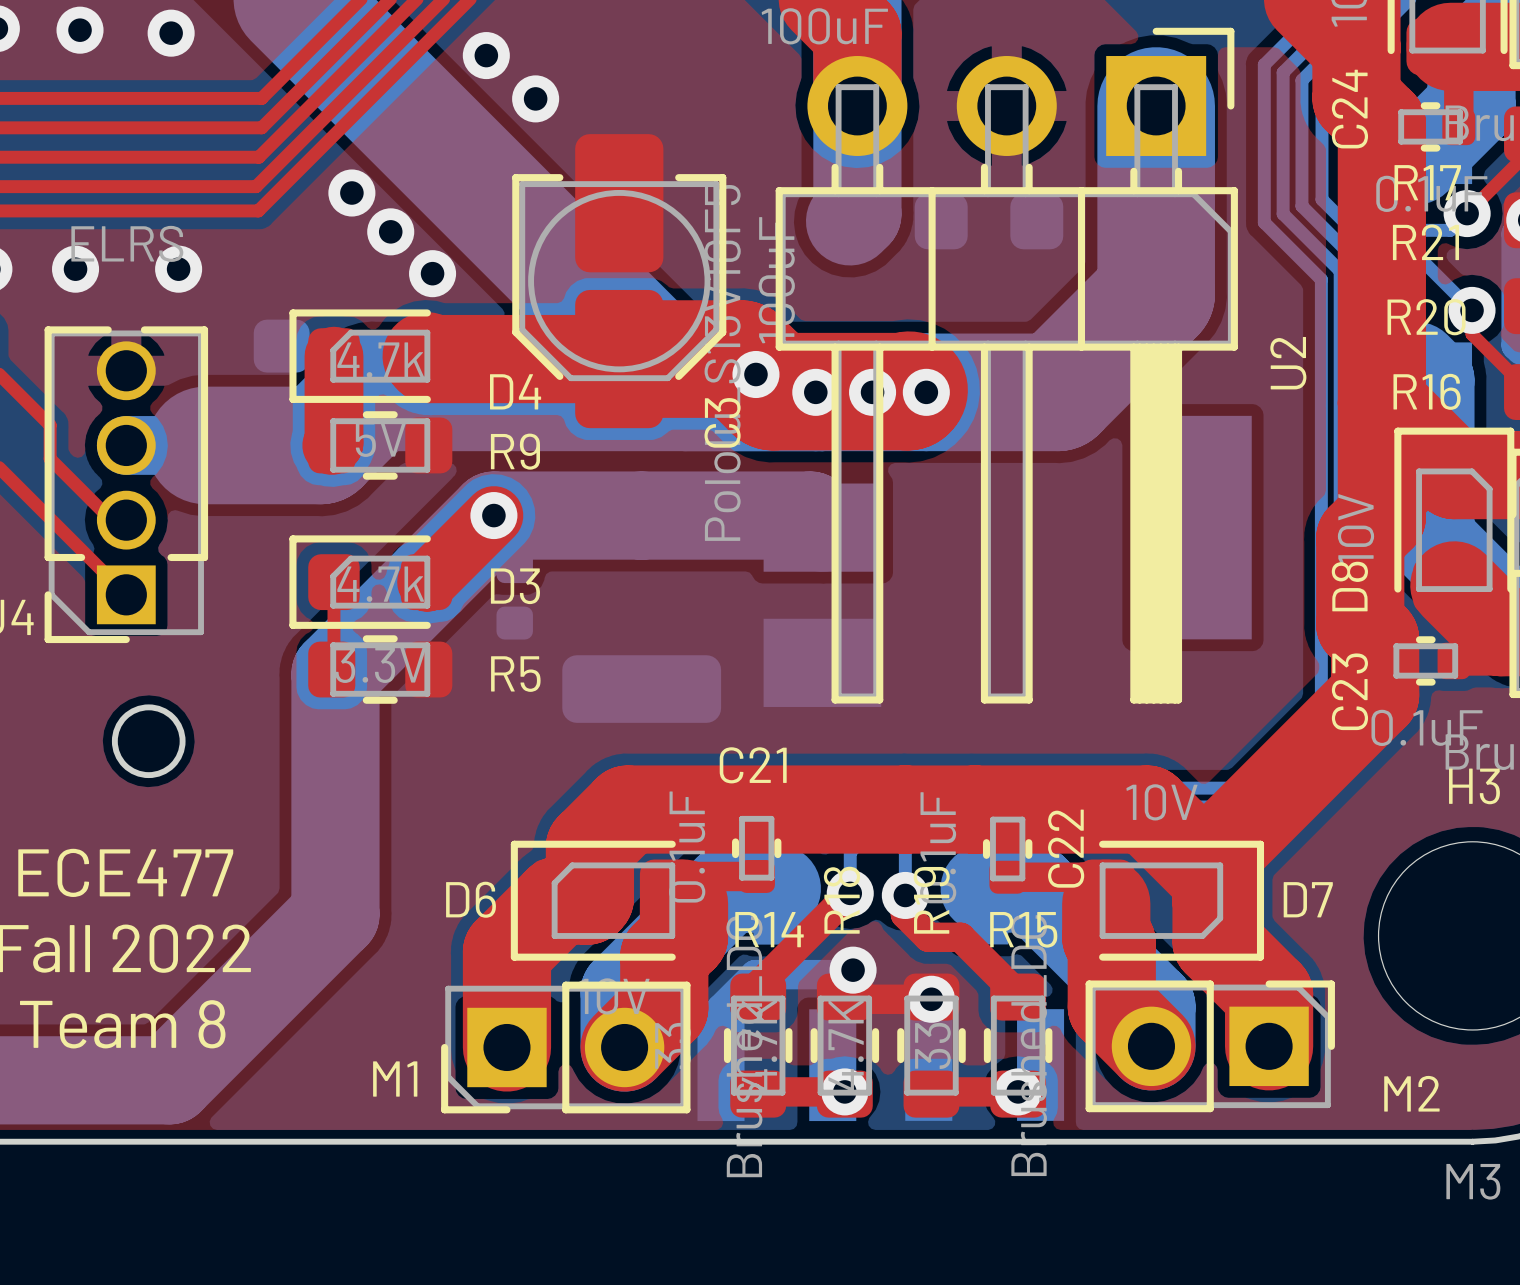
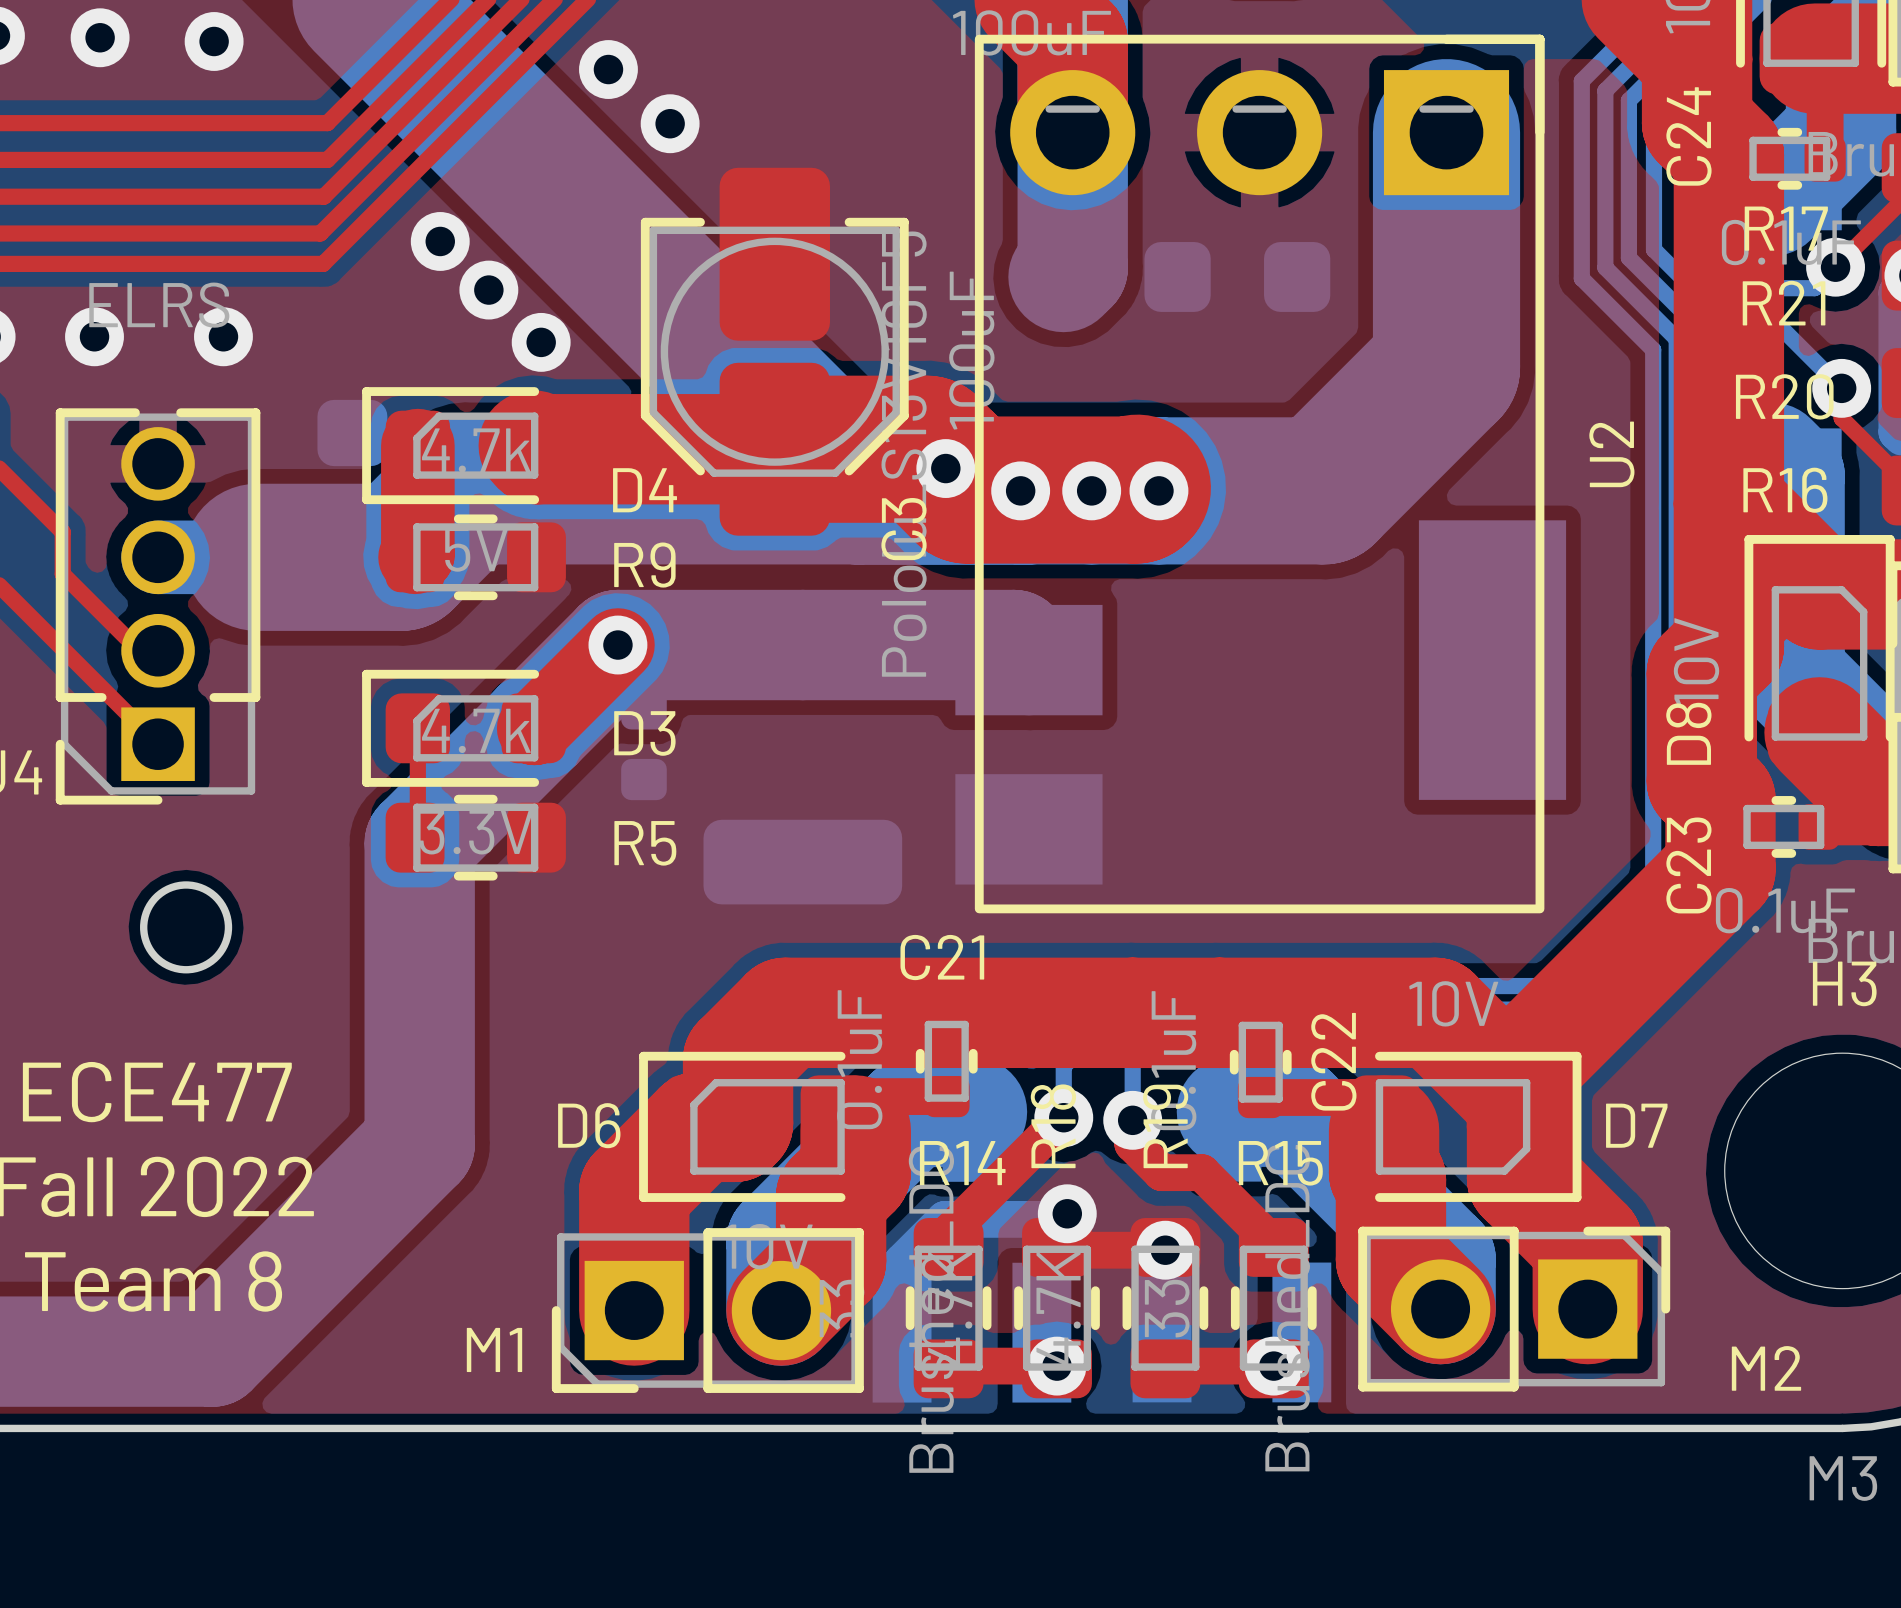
U2 footprint: [775, 27, 1238, 704] -> [974, 34, 1545, 914]

